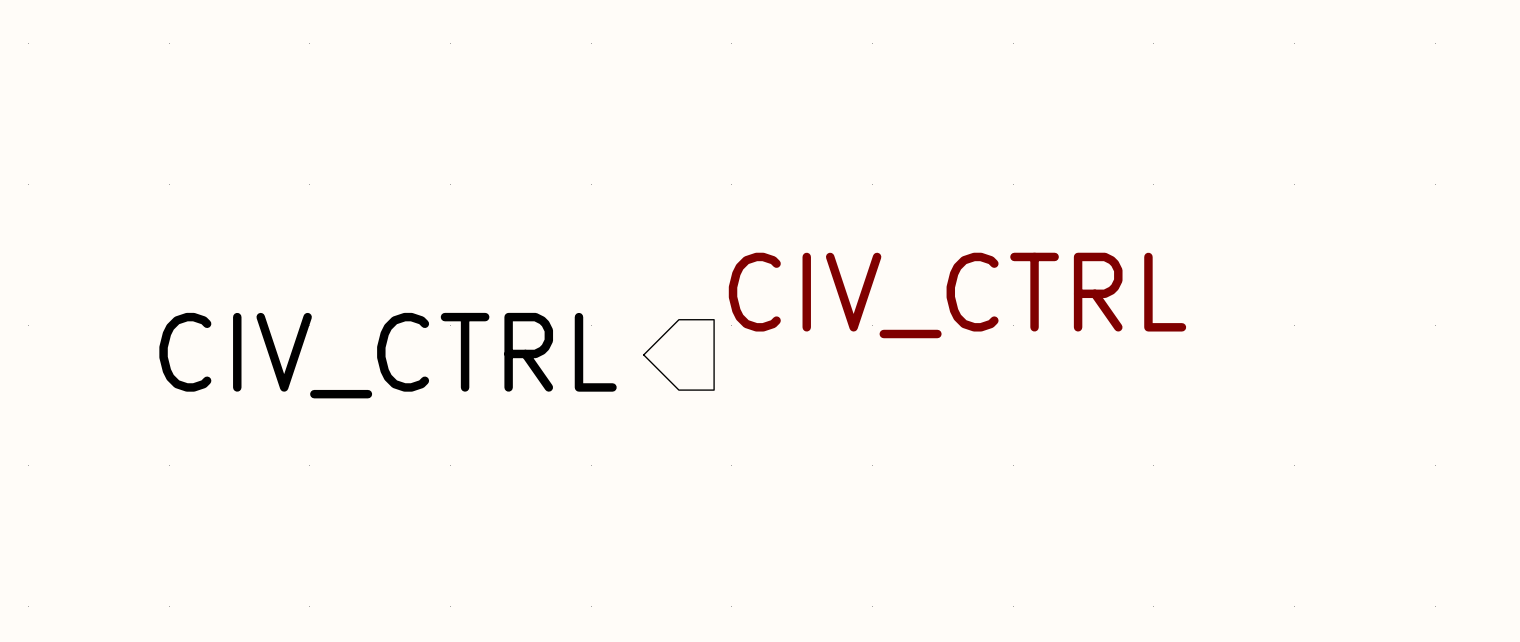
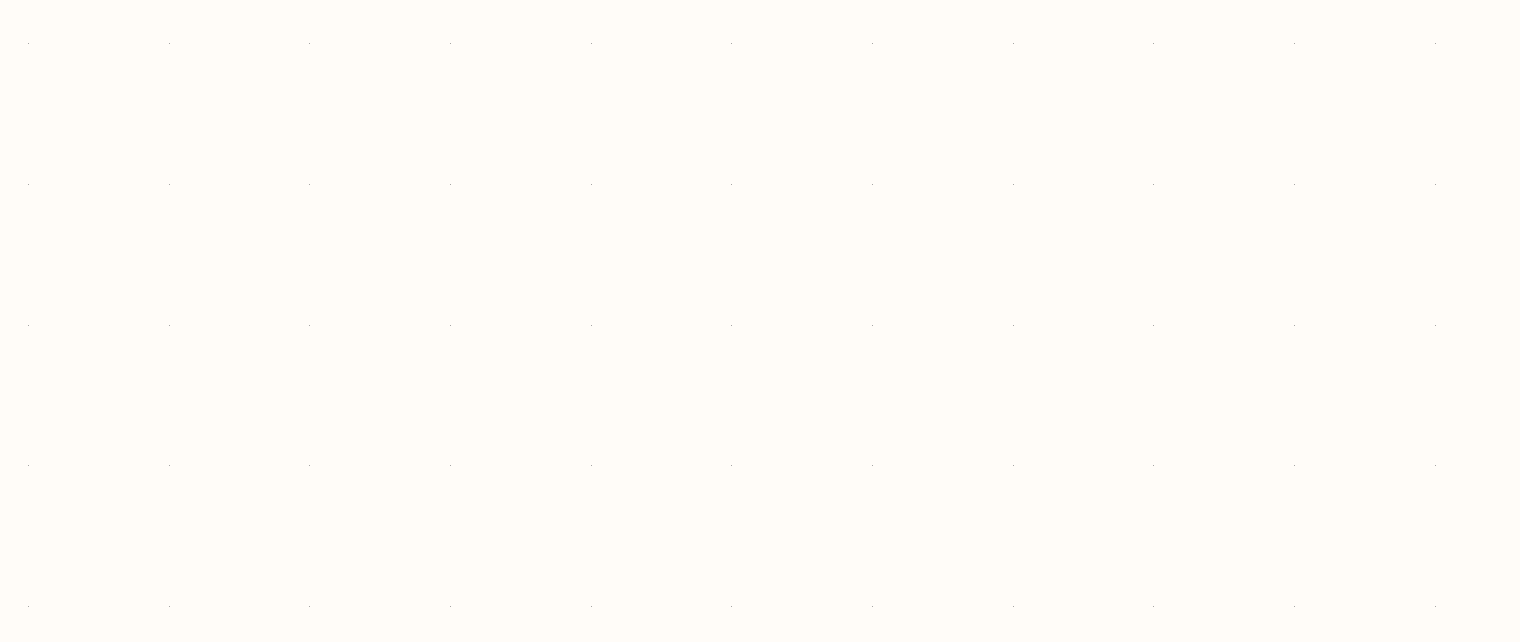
label: CIV_CTRL (957, 295) -> none
sheet pin: CIV_CTRL (388, 355) -> none

